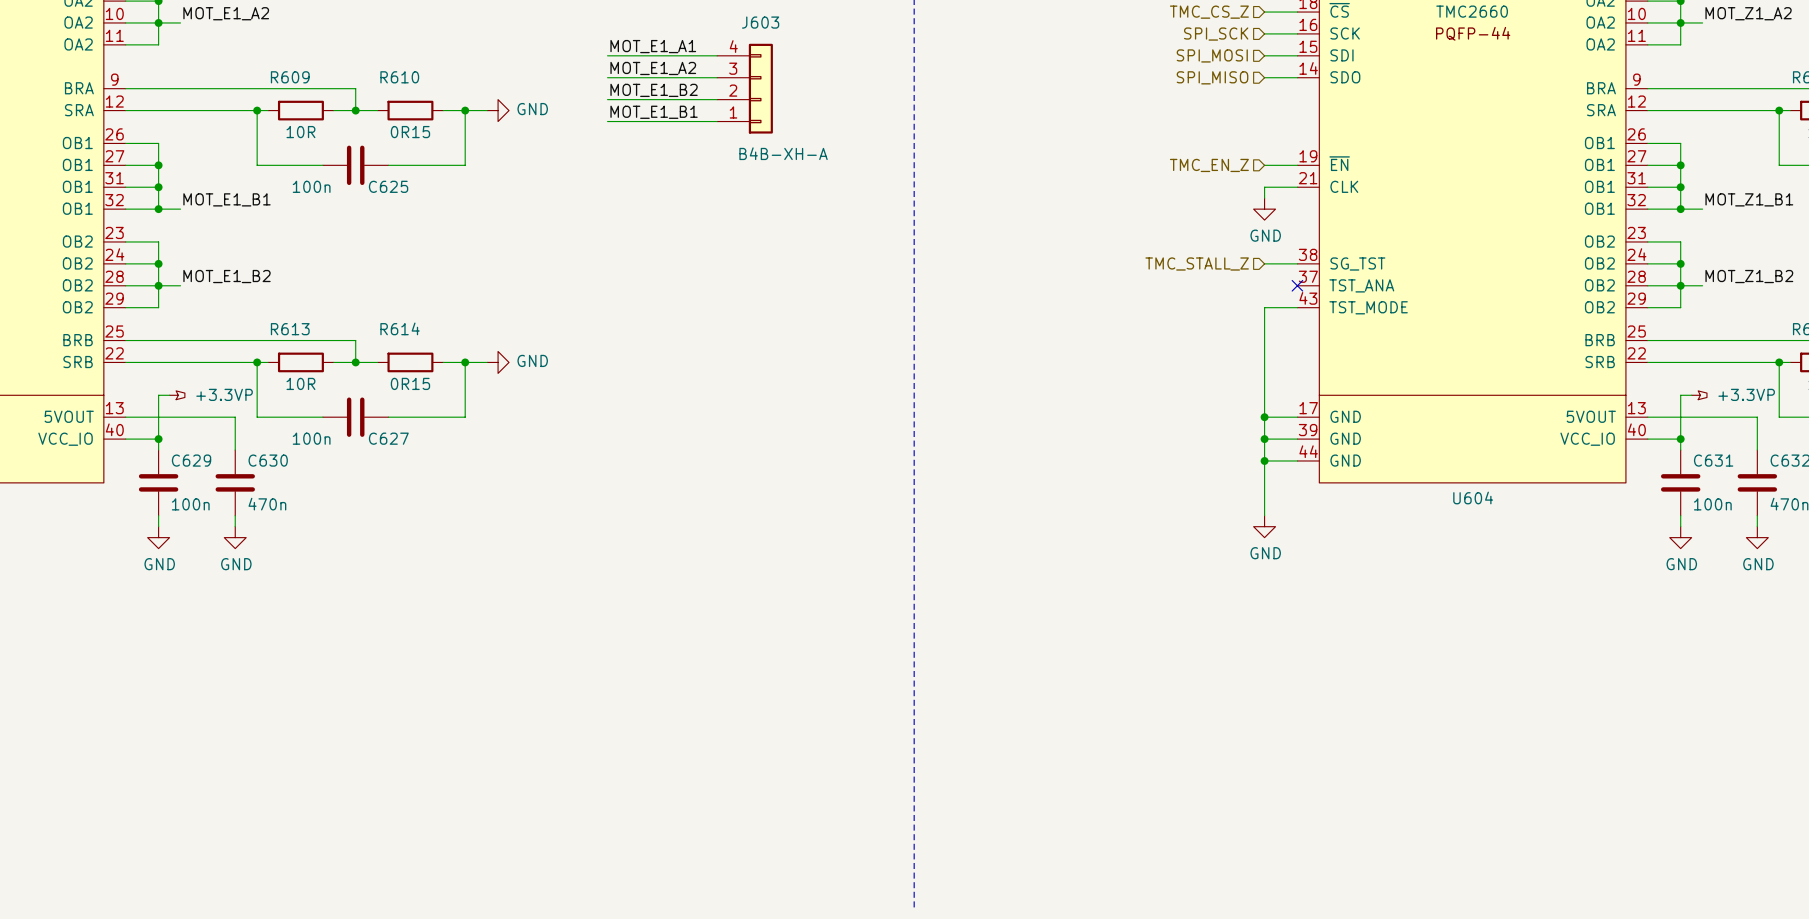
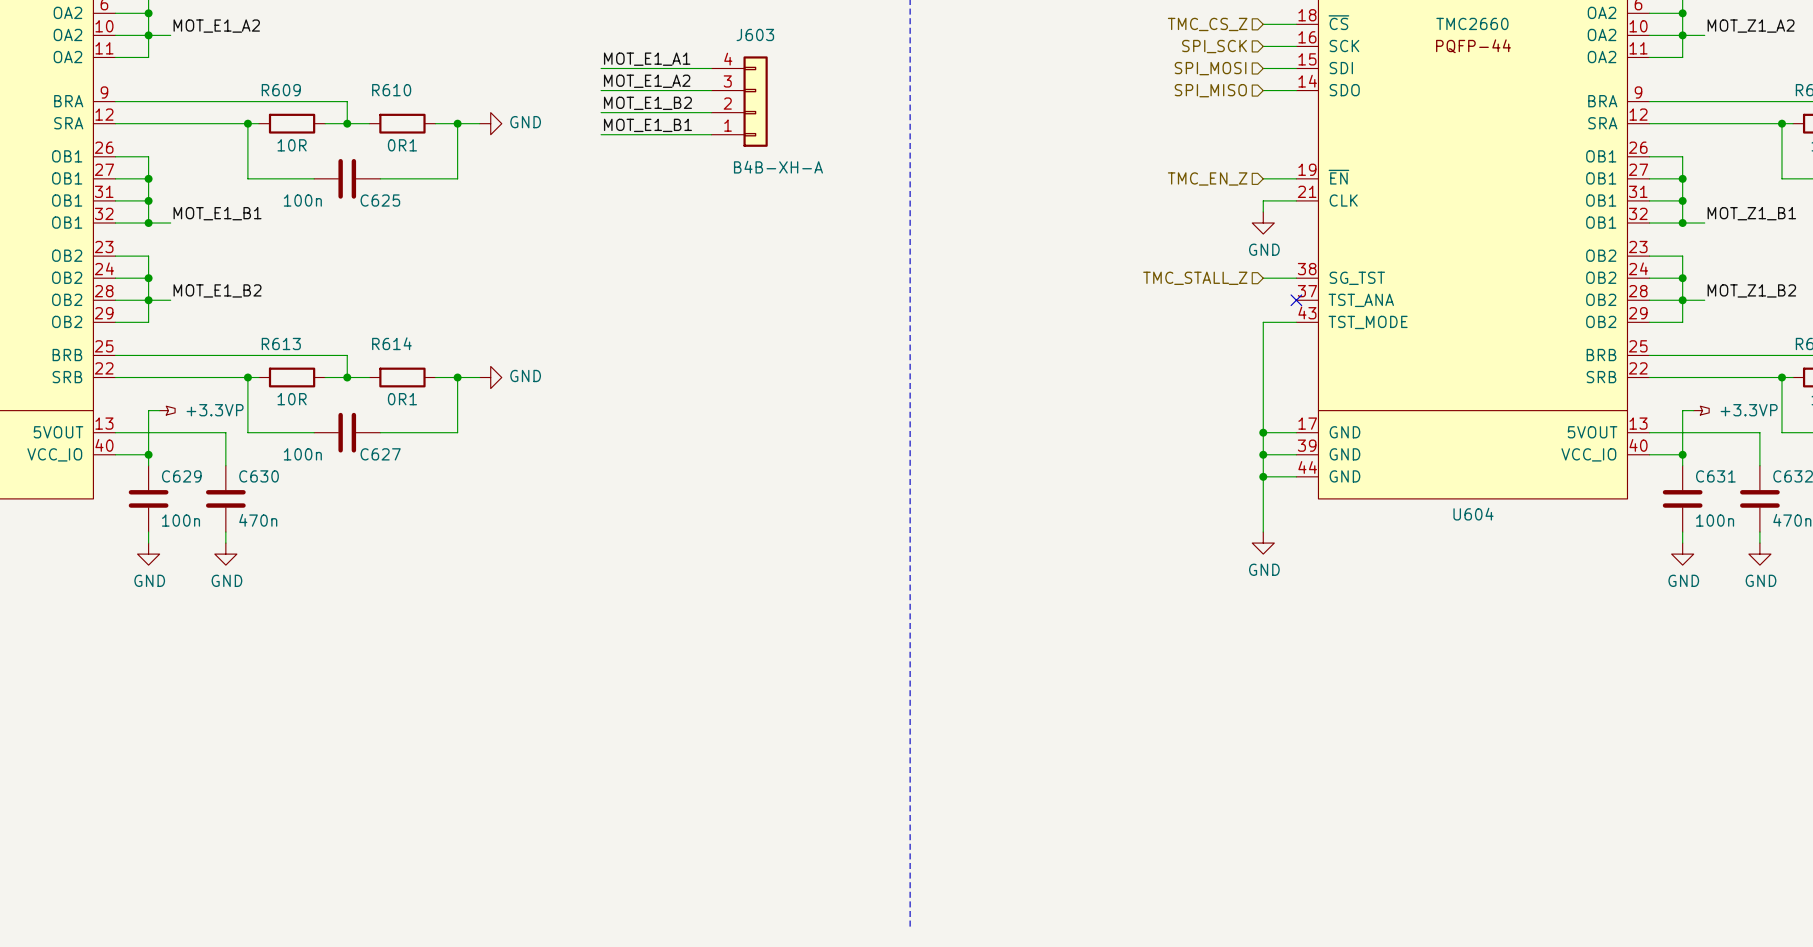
R610 value: 0R15 (410, 132) -> 0R1 (402, 145)
R614 value: 0R15 (410, 383) -> 0R1 (402, 399)

